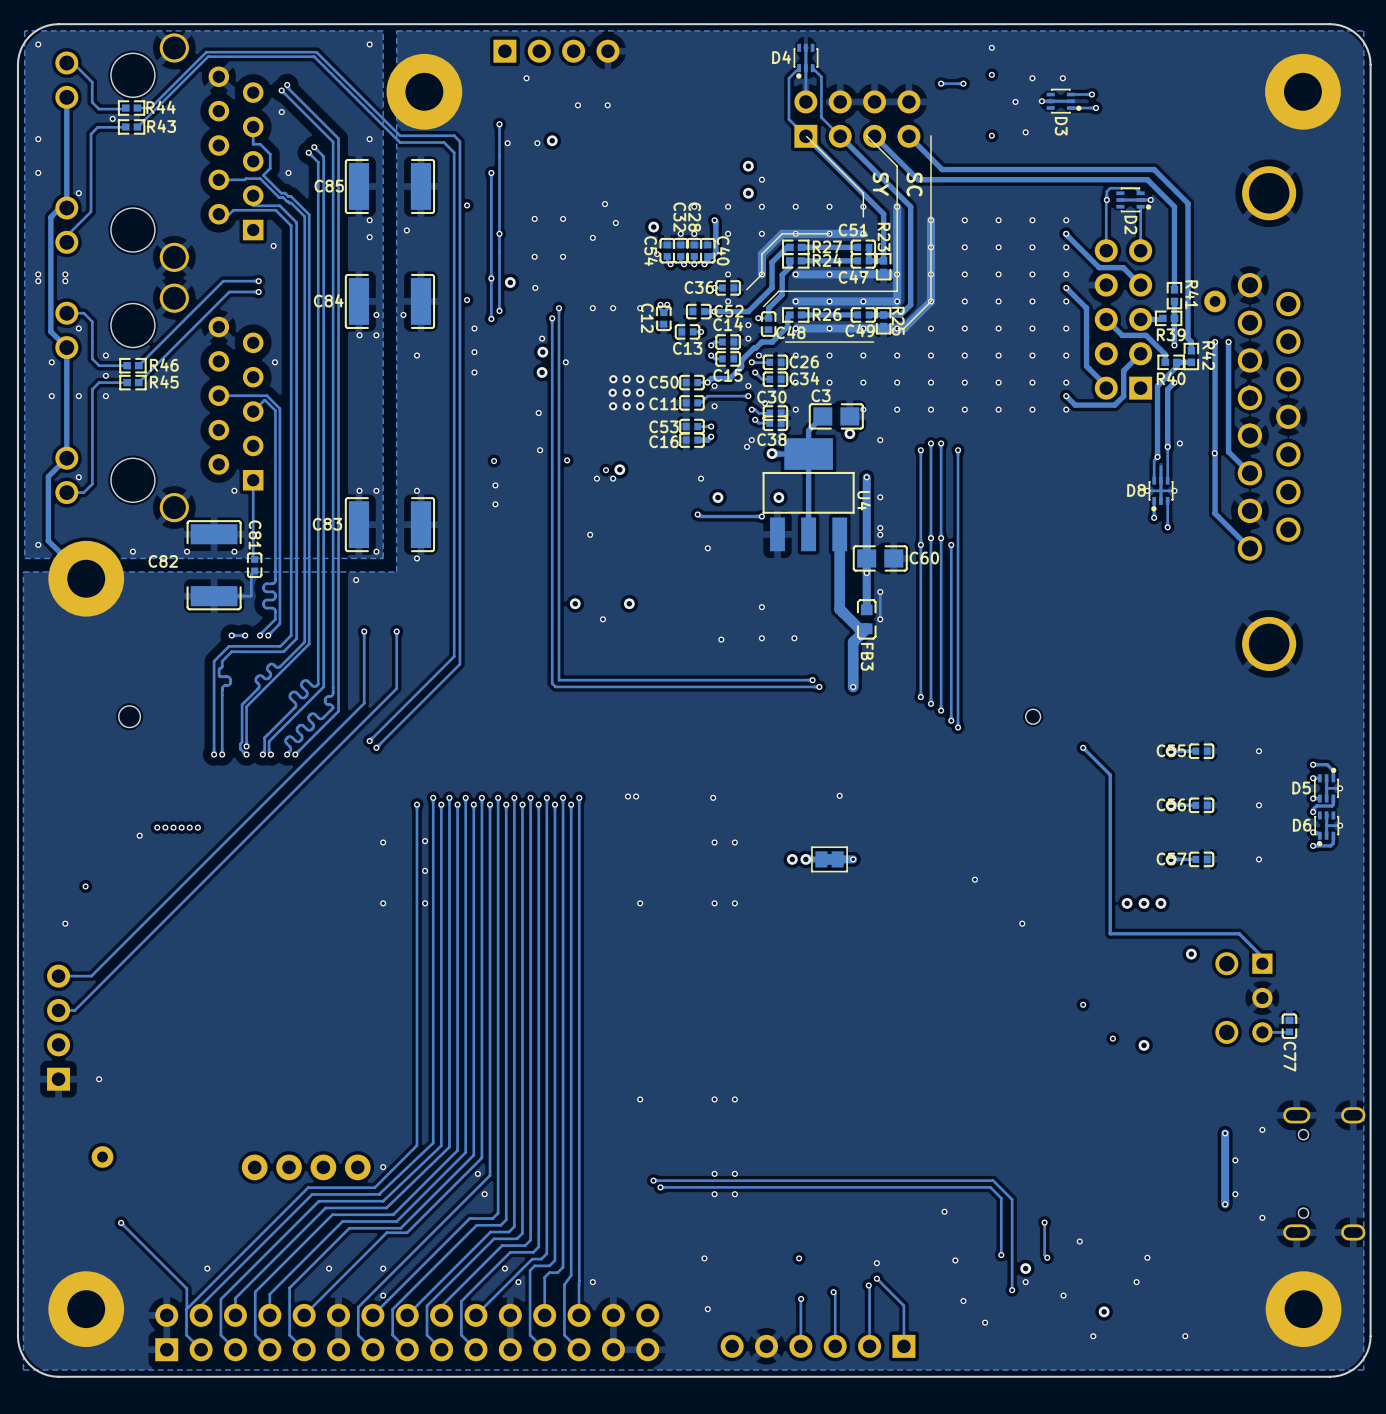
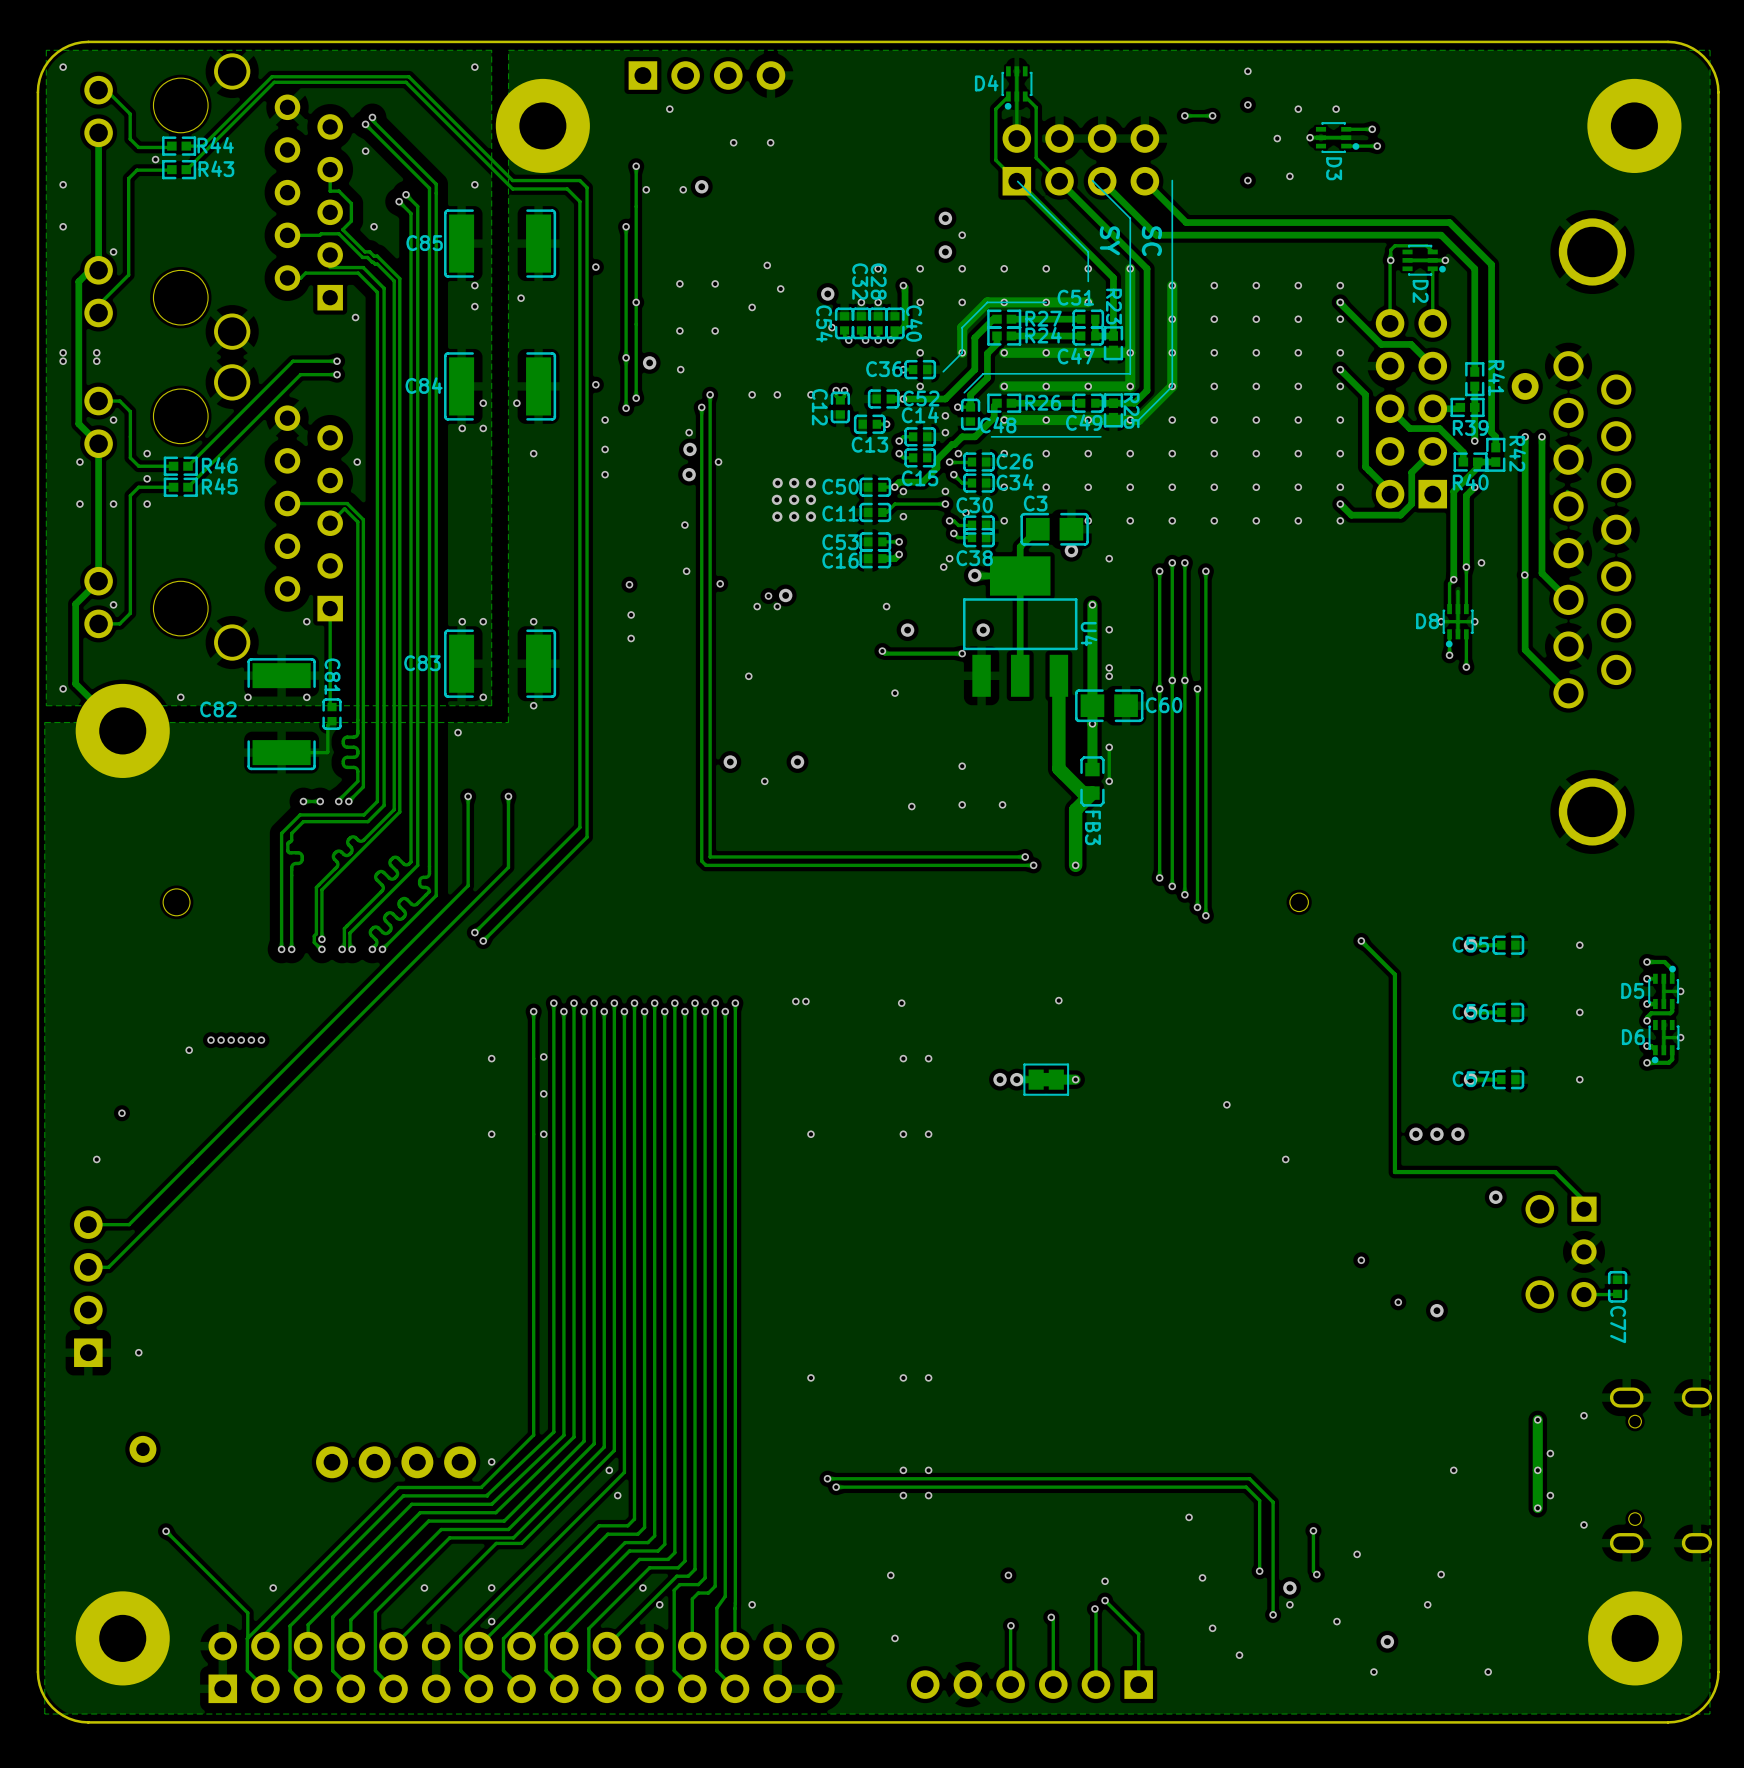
via: none -> (1453, 1470)
via: none -> (1537, 1470)

